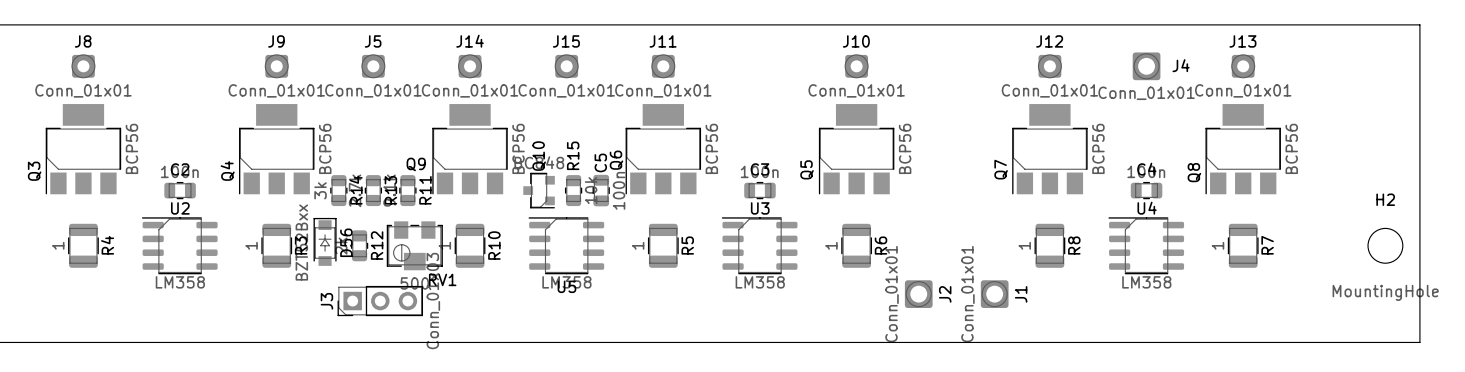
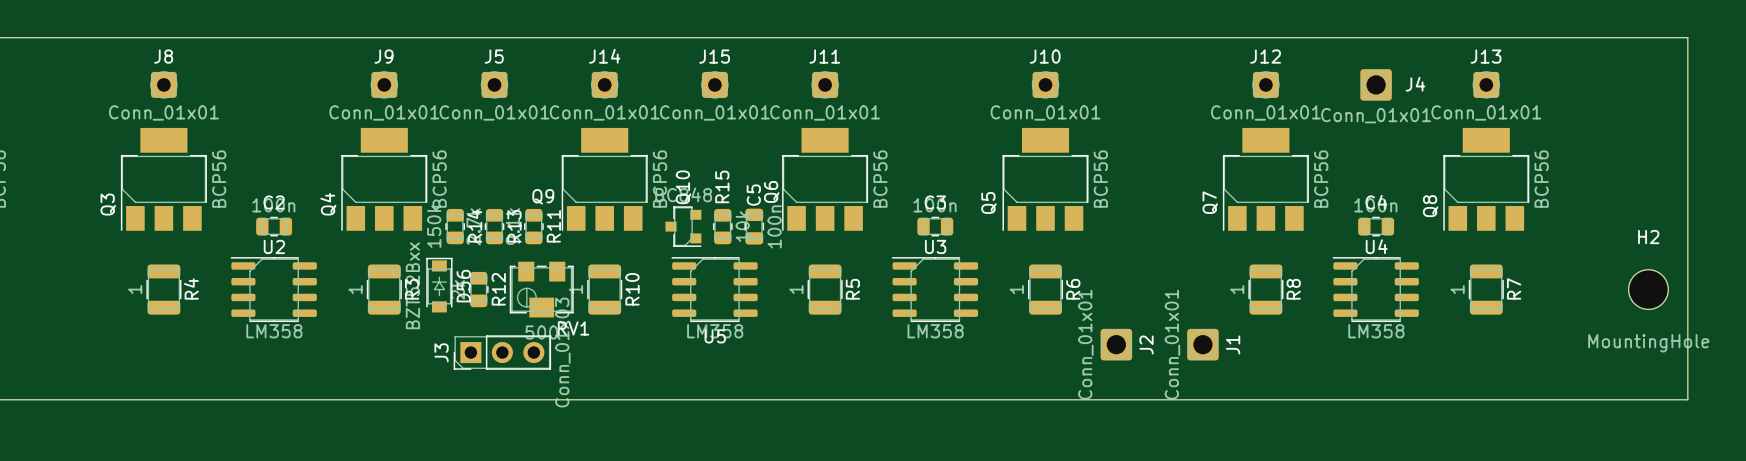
R14 value: 3k (320, 190) -> 150k (434, 226)

